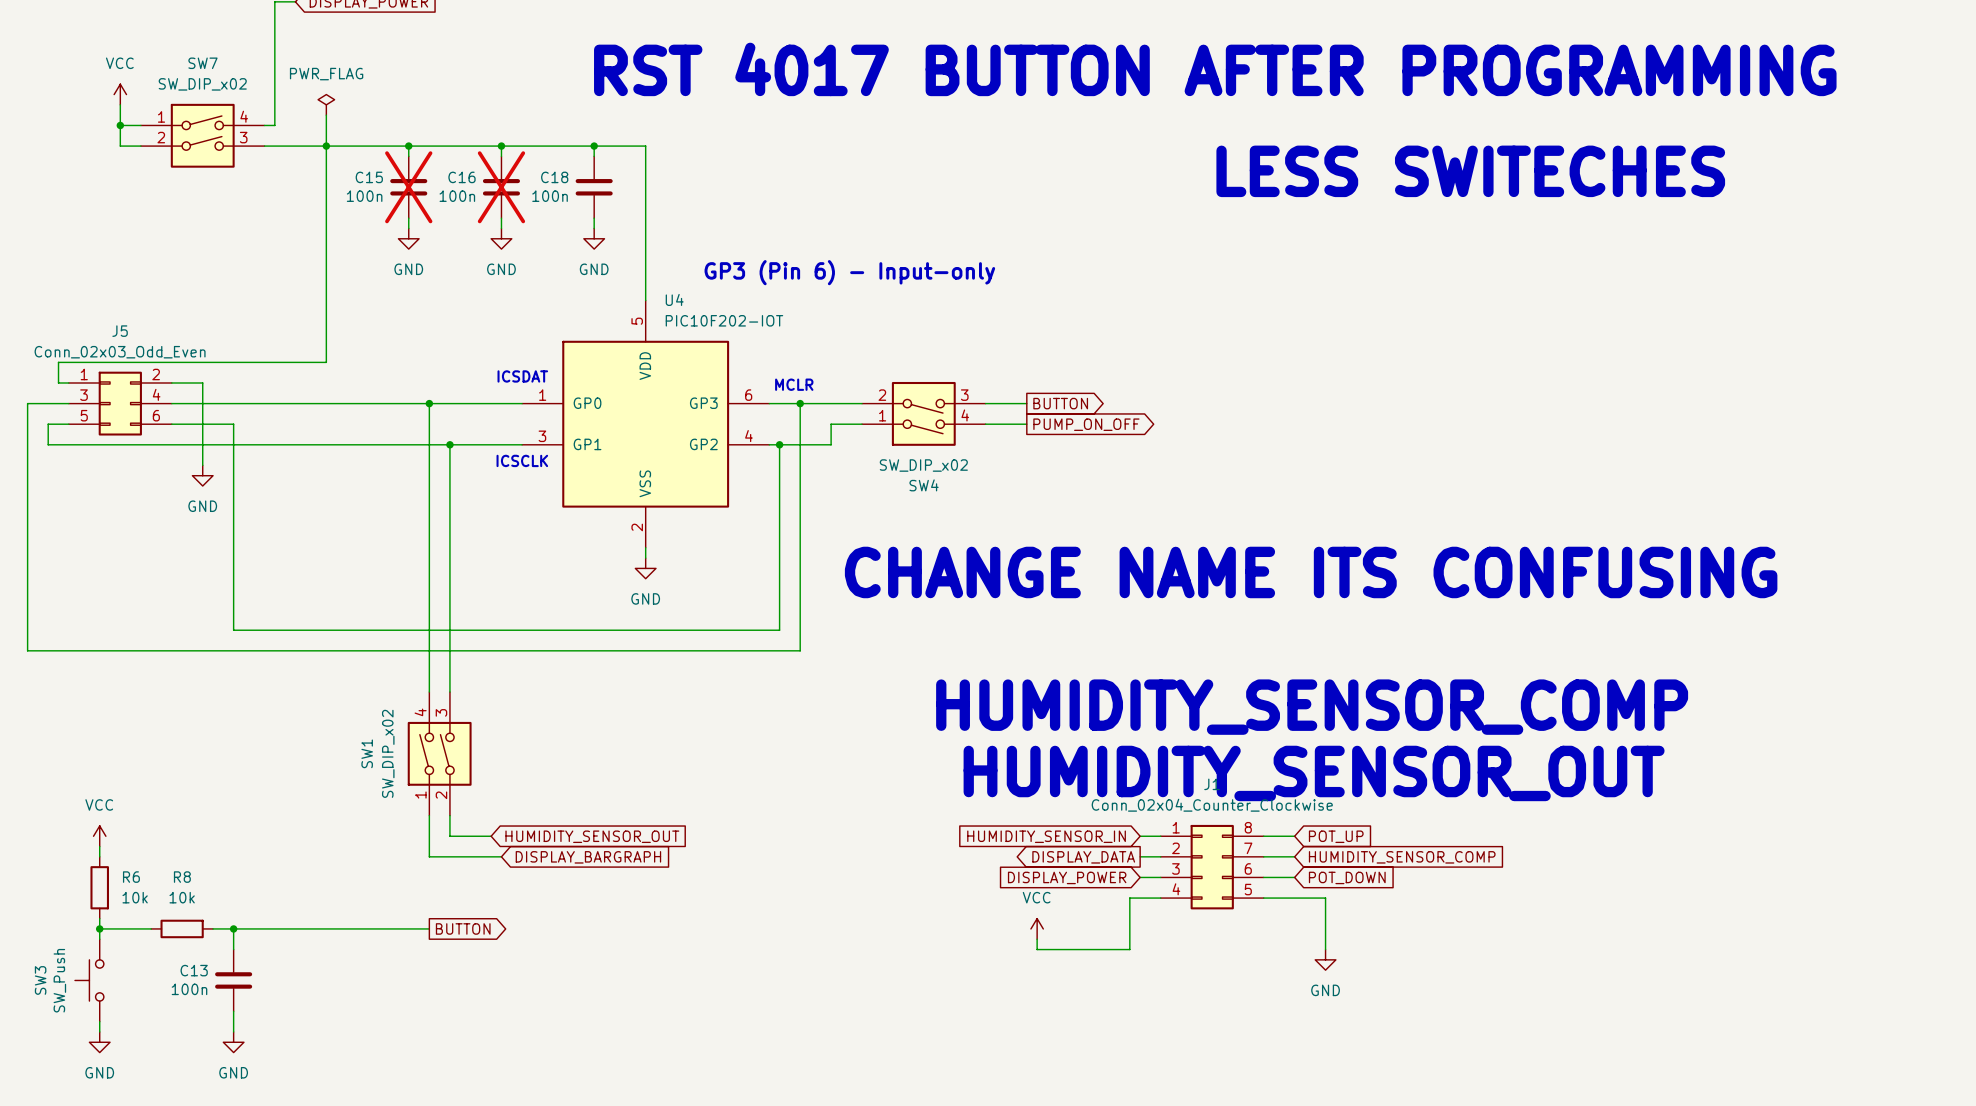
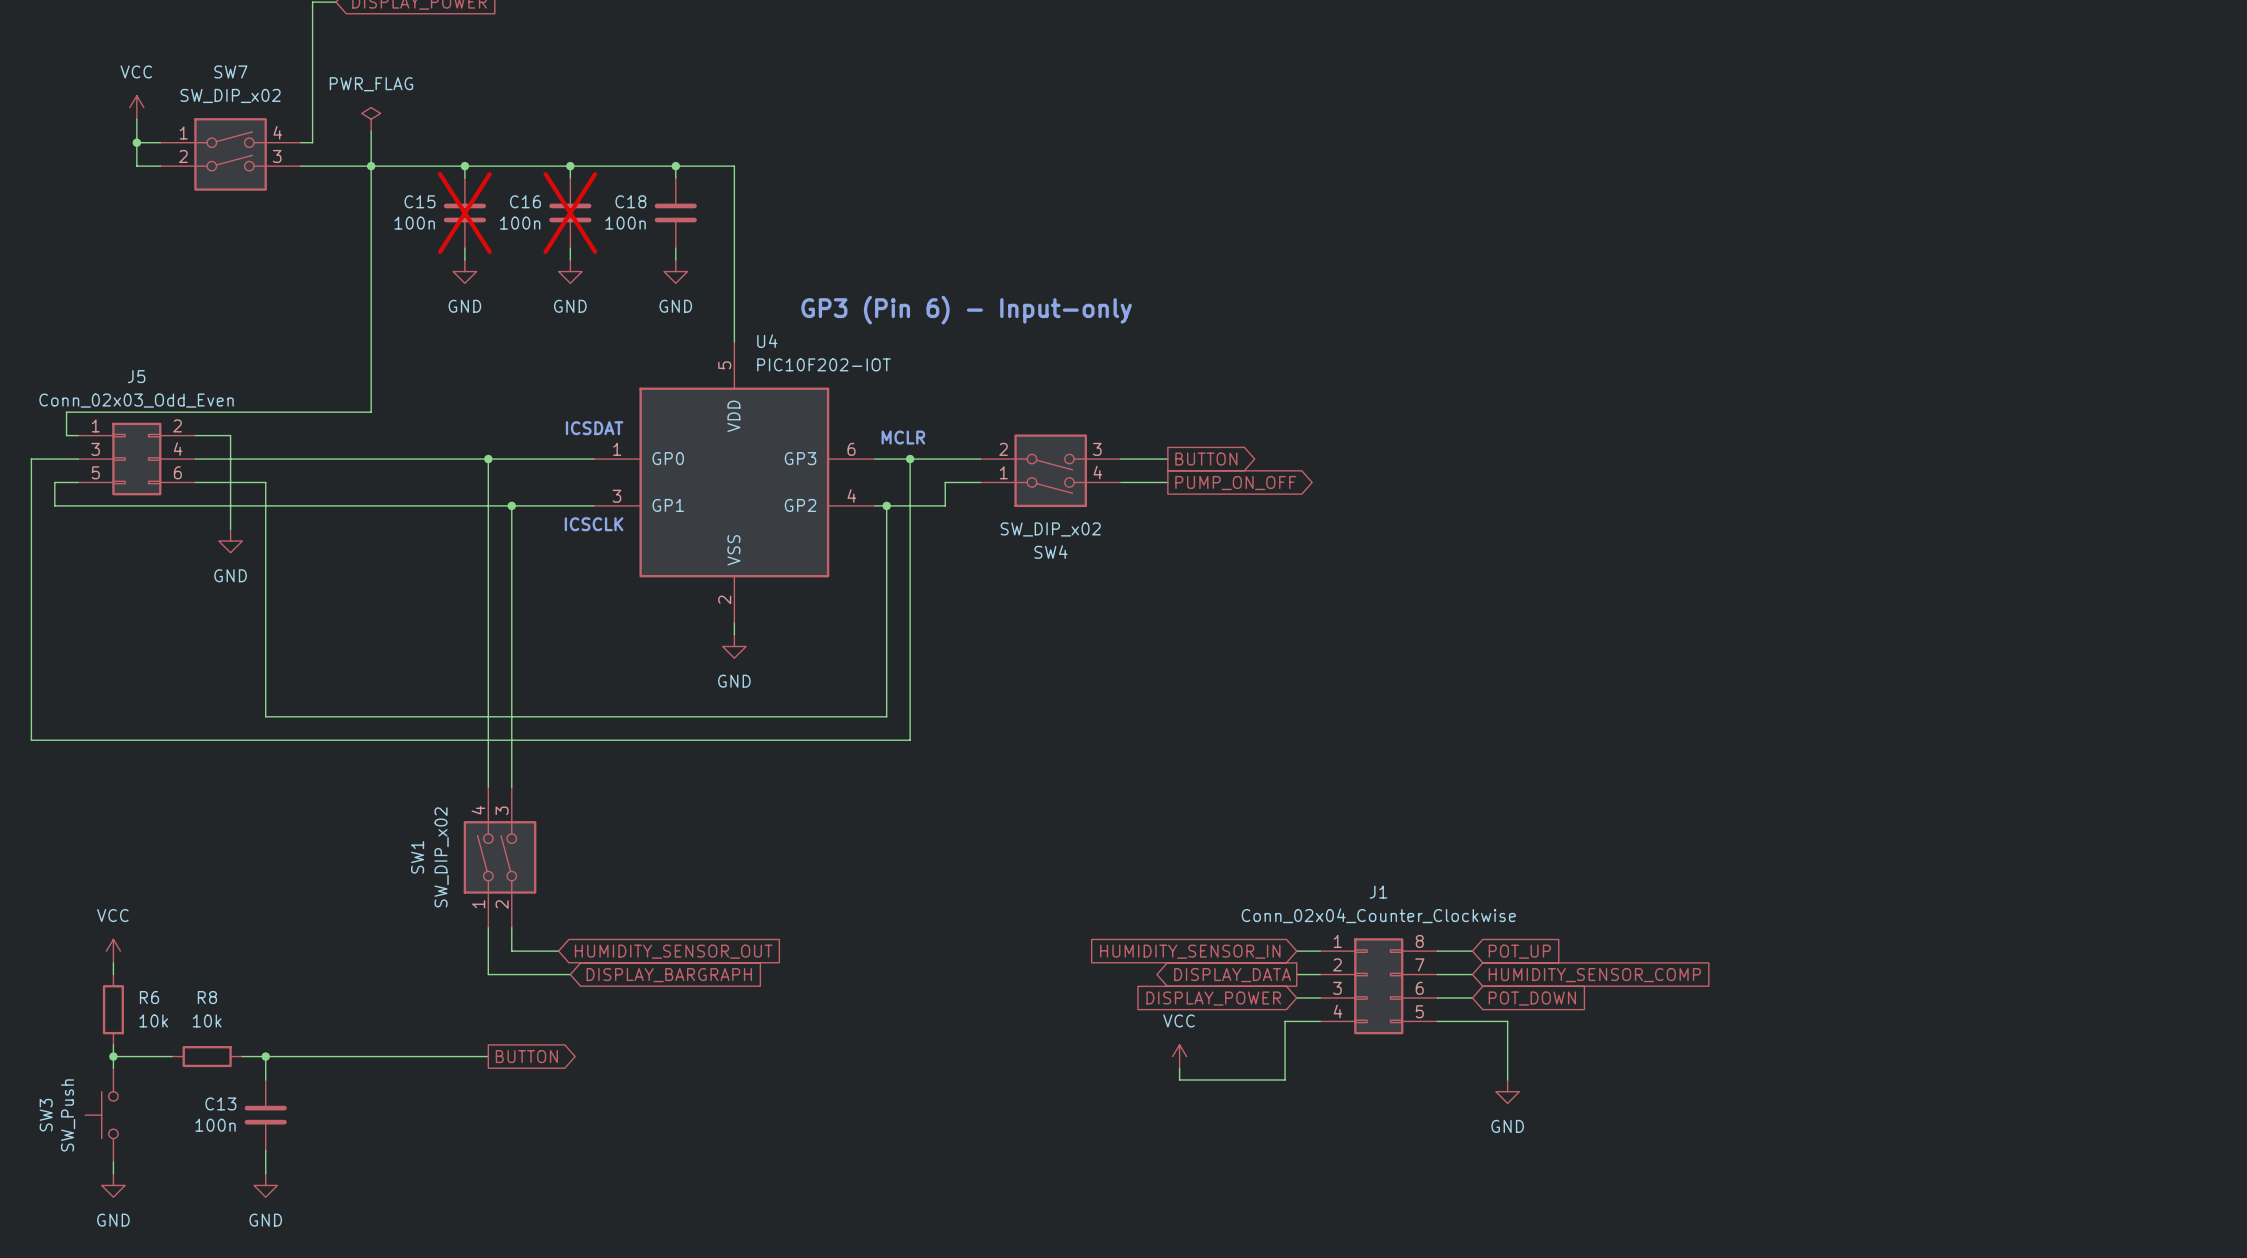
text: RST 4017 BUTTON AFTER PROGRAMMING (1215, 69) -> none
text: LESS SWITECHES (1470, 171) -> none
text: CHANGE NAME ITS CONFUSING (1311, 572) -> none
text: HUMIDITY_SENSOR_COMP (1312, 707) -> none
text: HUMIDITY_SENSOR_OUT (1314, 773) -> none

